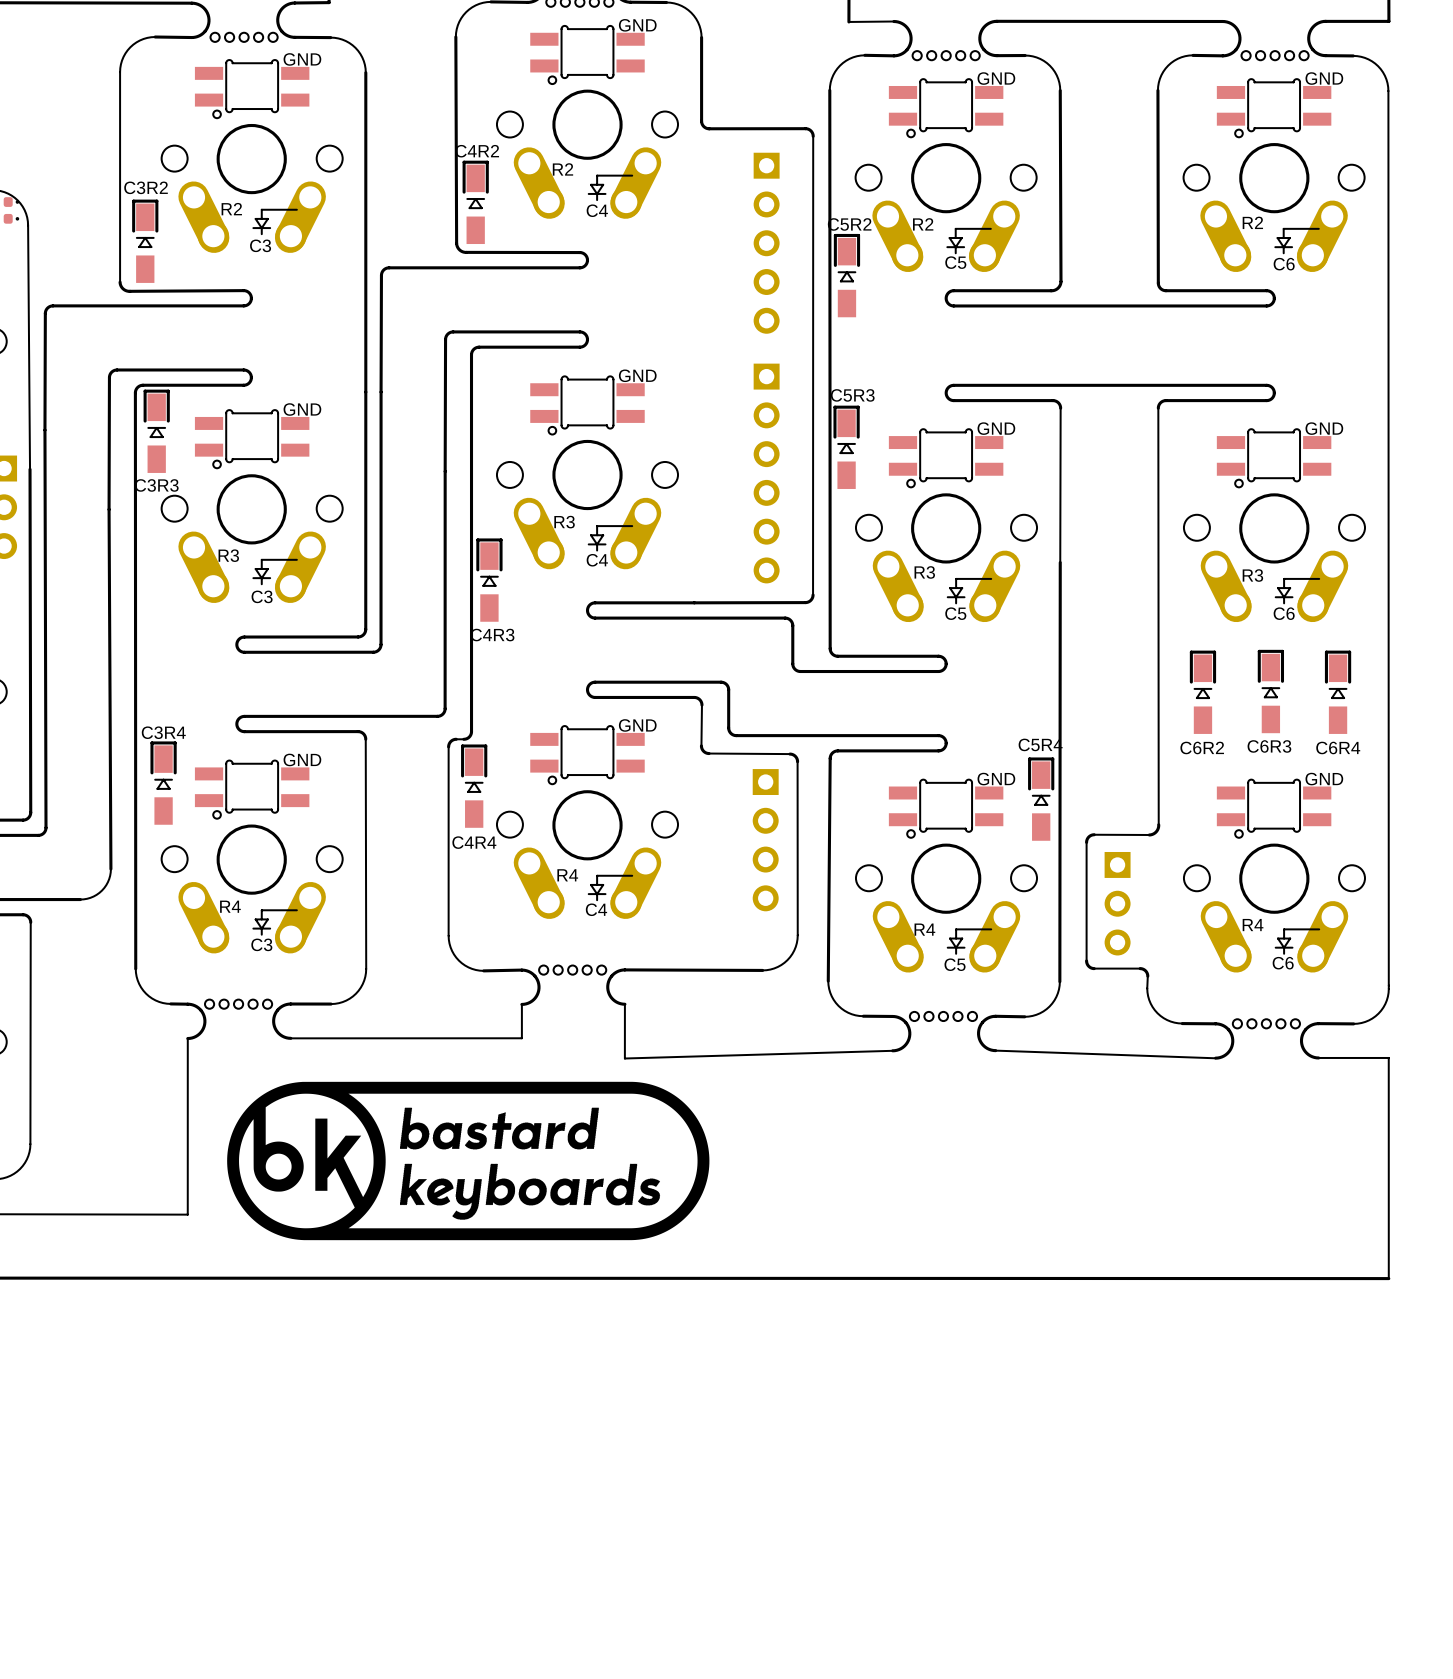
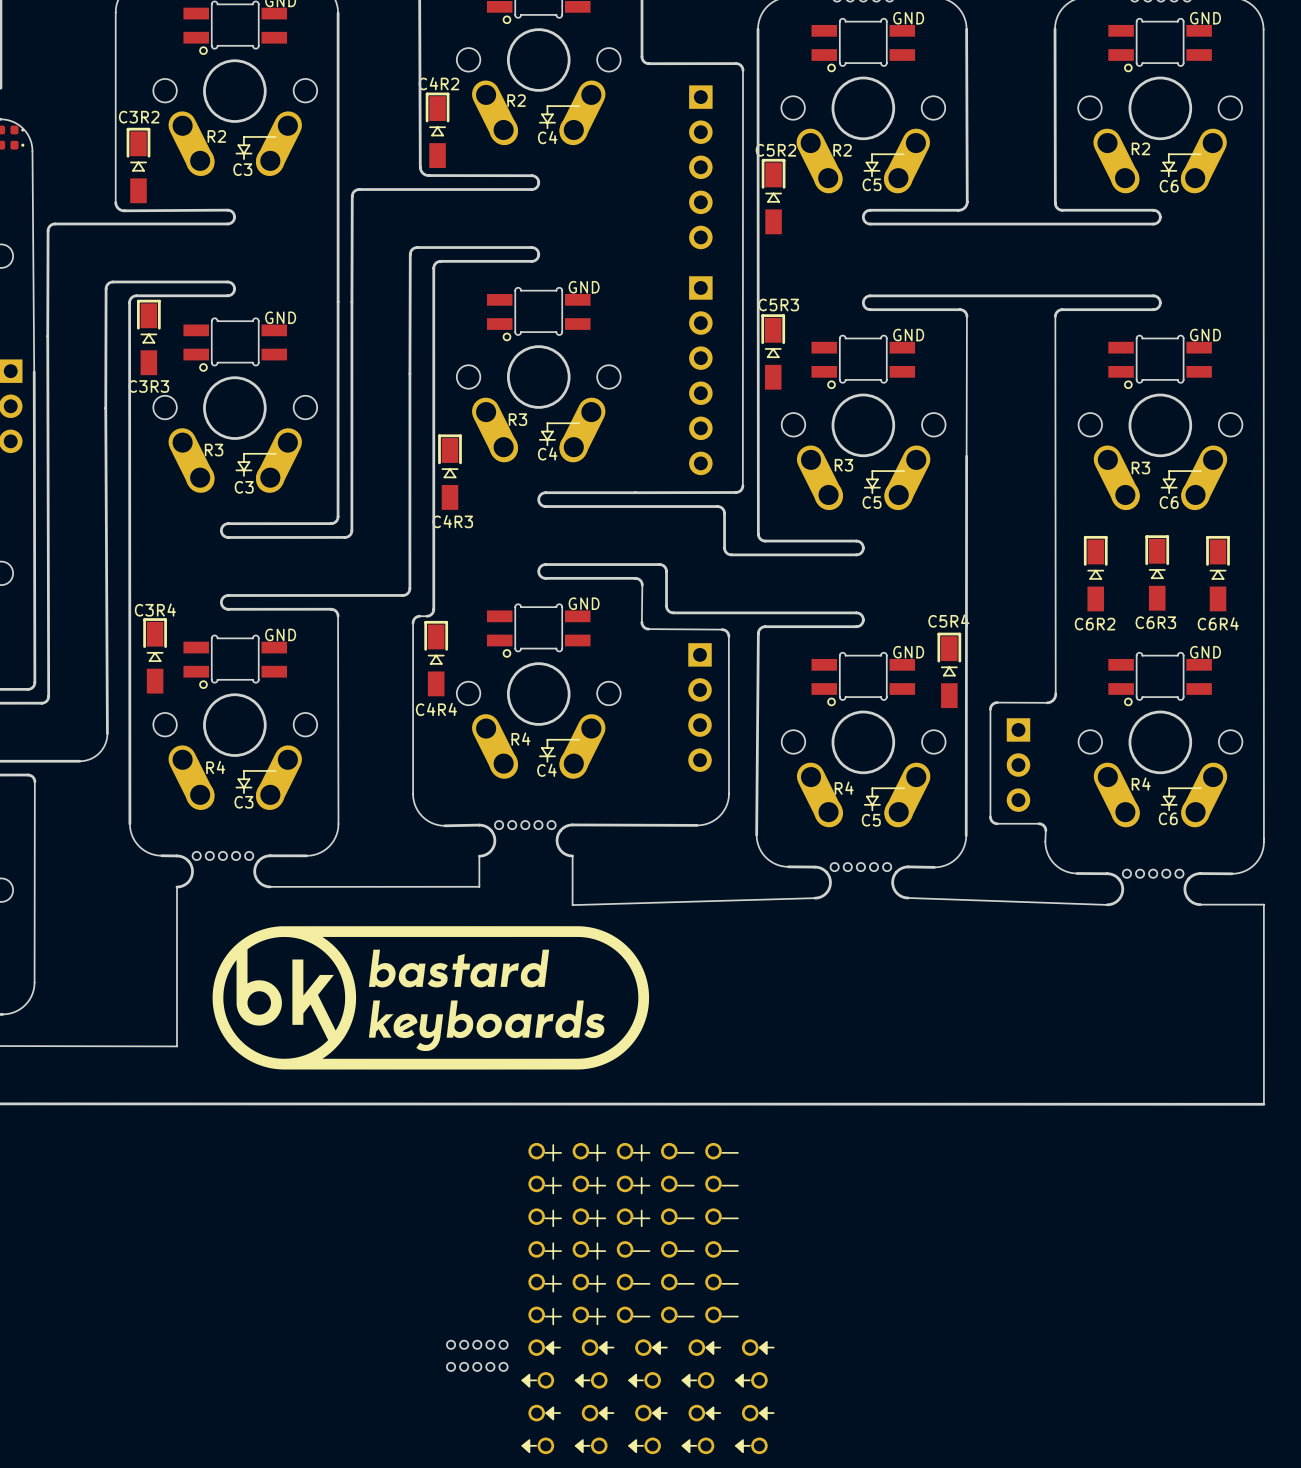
part: none -> (536, 1151)
part: none -> (580, 1151)
part: none -> (625, 1151)
part: none -> (669, 1151)
part: none -> (713, 1151)
part: none -> (536, 1183)
part: none -> (580, 1183)
part: none -> (625, 1183)
part: none -> (669, 1183)
part: none -> (713, 1183)
part: none -> (536, 1216)
part: none -> (580, 1216)
part: none -> (625, 1216)
part: none -> (669, 1216)
part: none -> (713, 1216)
part: none -> (536, 1249)
part: none -> (580, 1249)
part: none -> (625, 1249)
part: none -> (669, 1249)
part: none -> (713, 1249)
part: none -> (536, 1282)
part: none -> (580, 1282)
part: none -> (625, 1282)
part: none -> (669, 1282)
part: none -> (713, 1282)
part: none -> (536, 1314)
part: none -> (580, 1314)
part: none -> (625, 1314)
part: none -> (669, 1314)
part: none -> (713, 1314)
part: none -> (477, 1344)
part: none -> (544, 1347)
part: none -> (598, 1347)
part: none -> (651, 1347)
part: none -> (704, 1347)
part: none -> (758, 1347)
part: none -> (477, 1366)
part: none -> (537, 1380)
part: none -> (591, 1380)
part: none -> (644, 1380)
part: none -> (697, 1380)
part: none -> (751, 1380)
part: none -> (544, 1413)
part: none -> (598, 1413)
part: none -> (651, 1413)
part: none -> (704, 1413)
part: none -> (758, 1413)
part: none -> (537, 1445)
part: none -> (591, 1445)
part: none -> (644, 1445)
part: none -> (697, 1445)
part: none -> (751, 1445)

